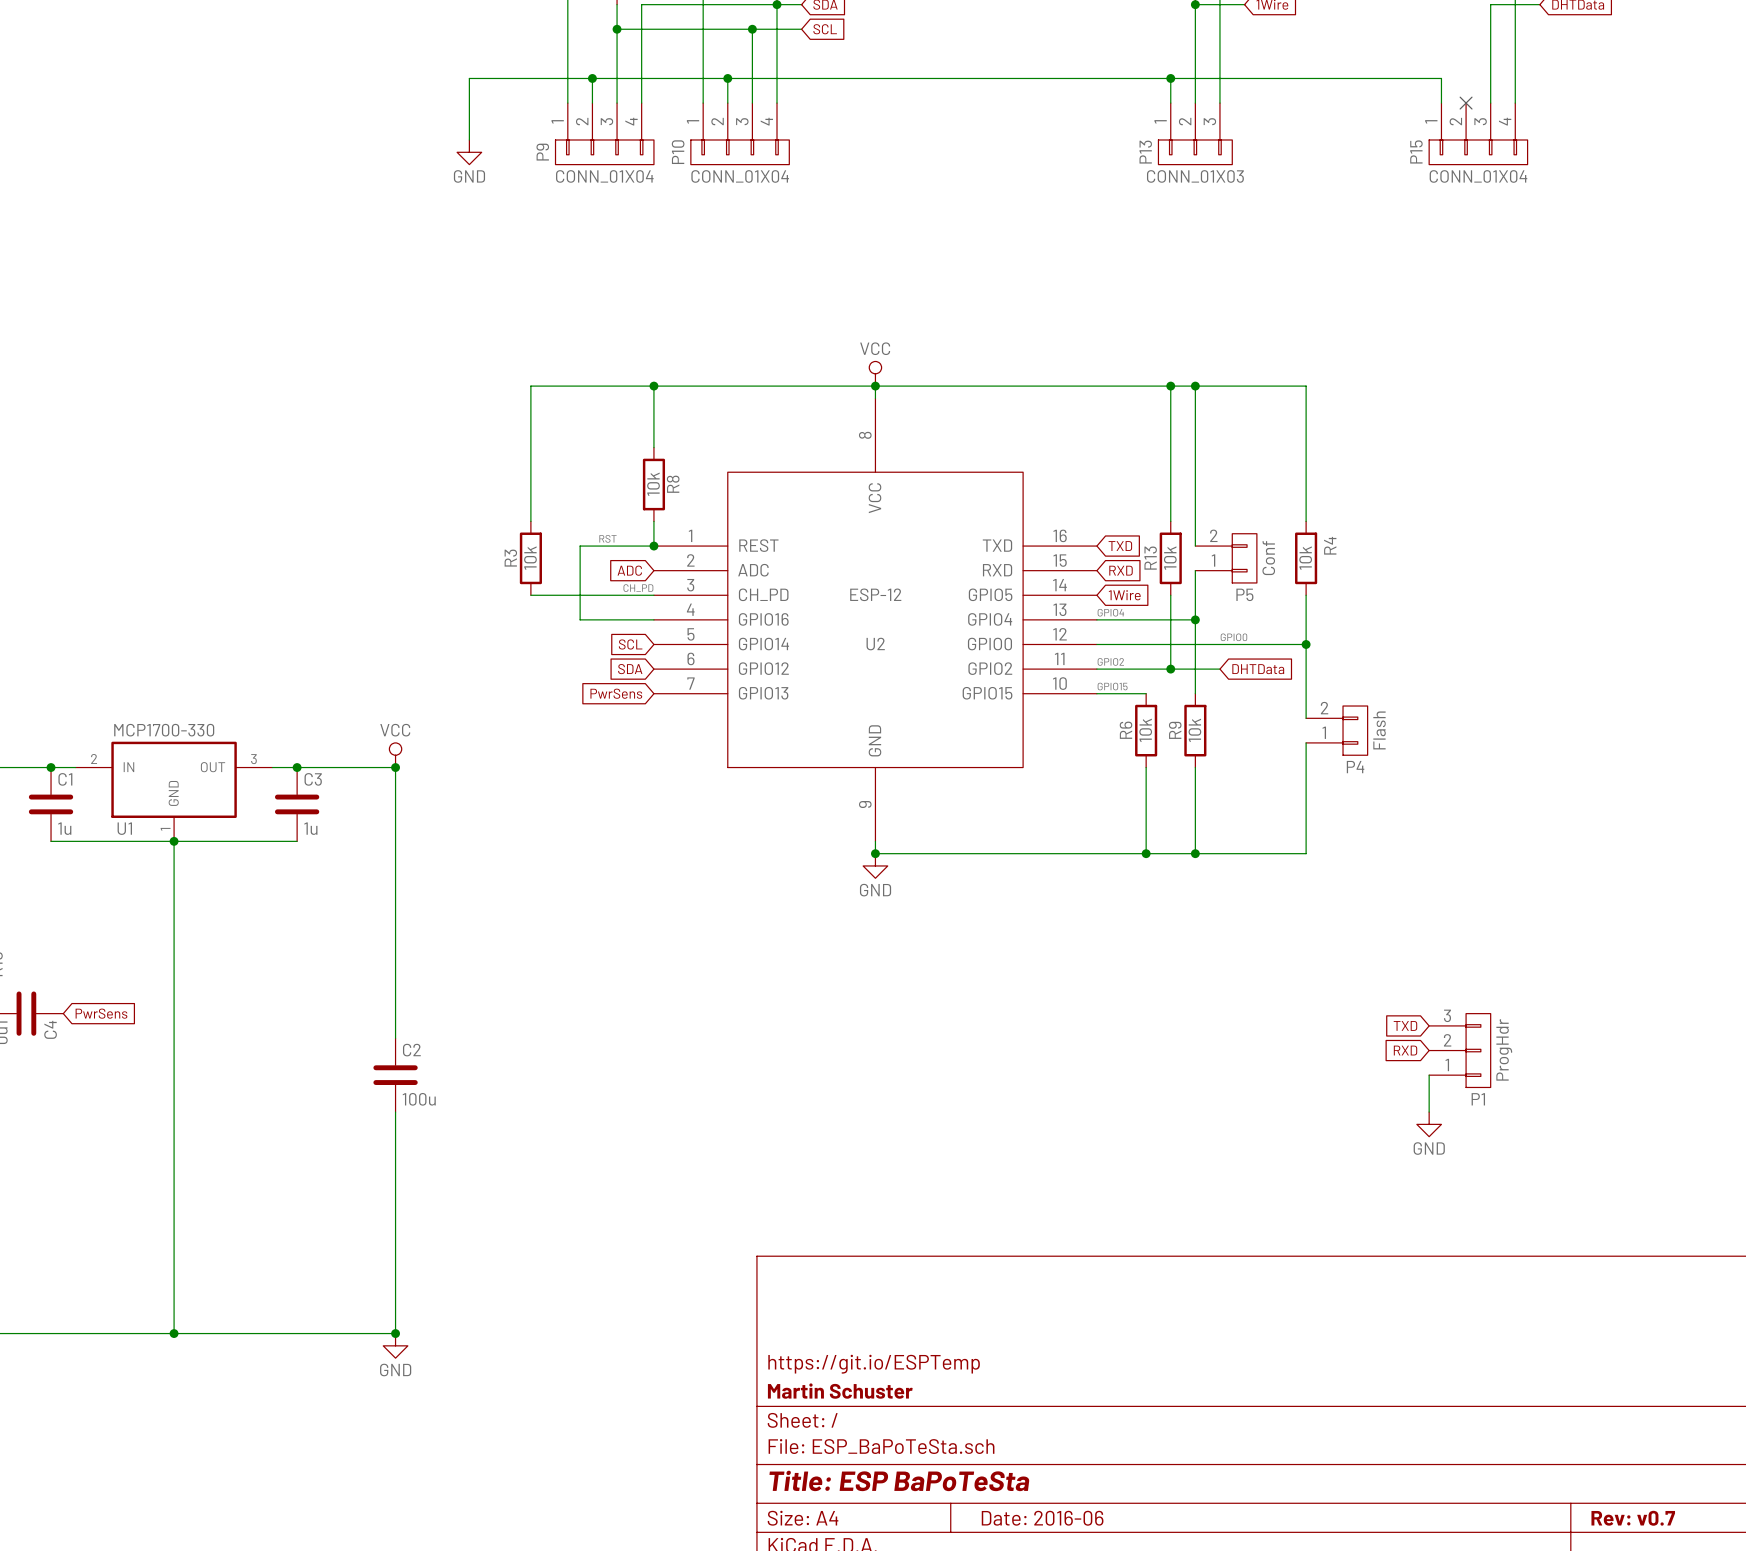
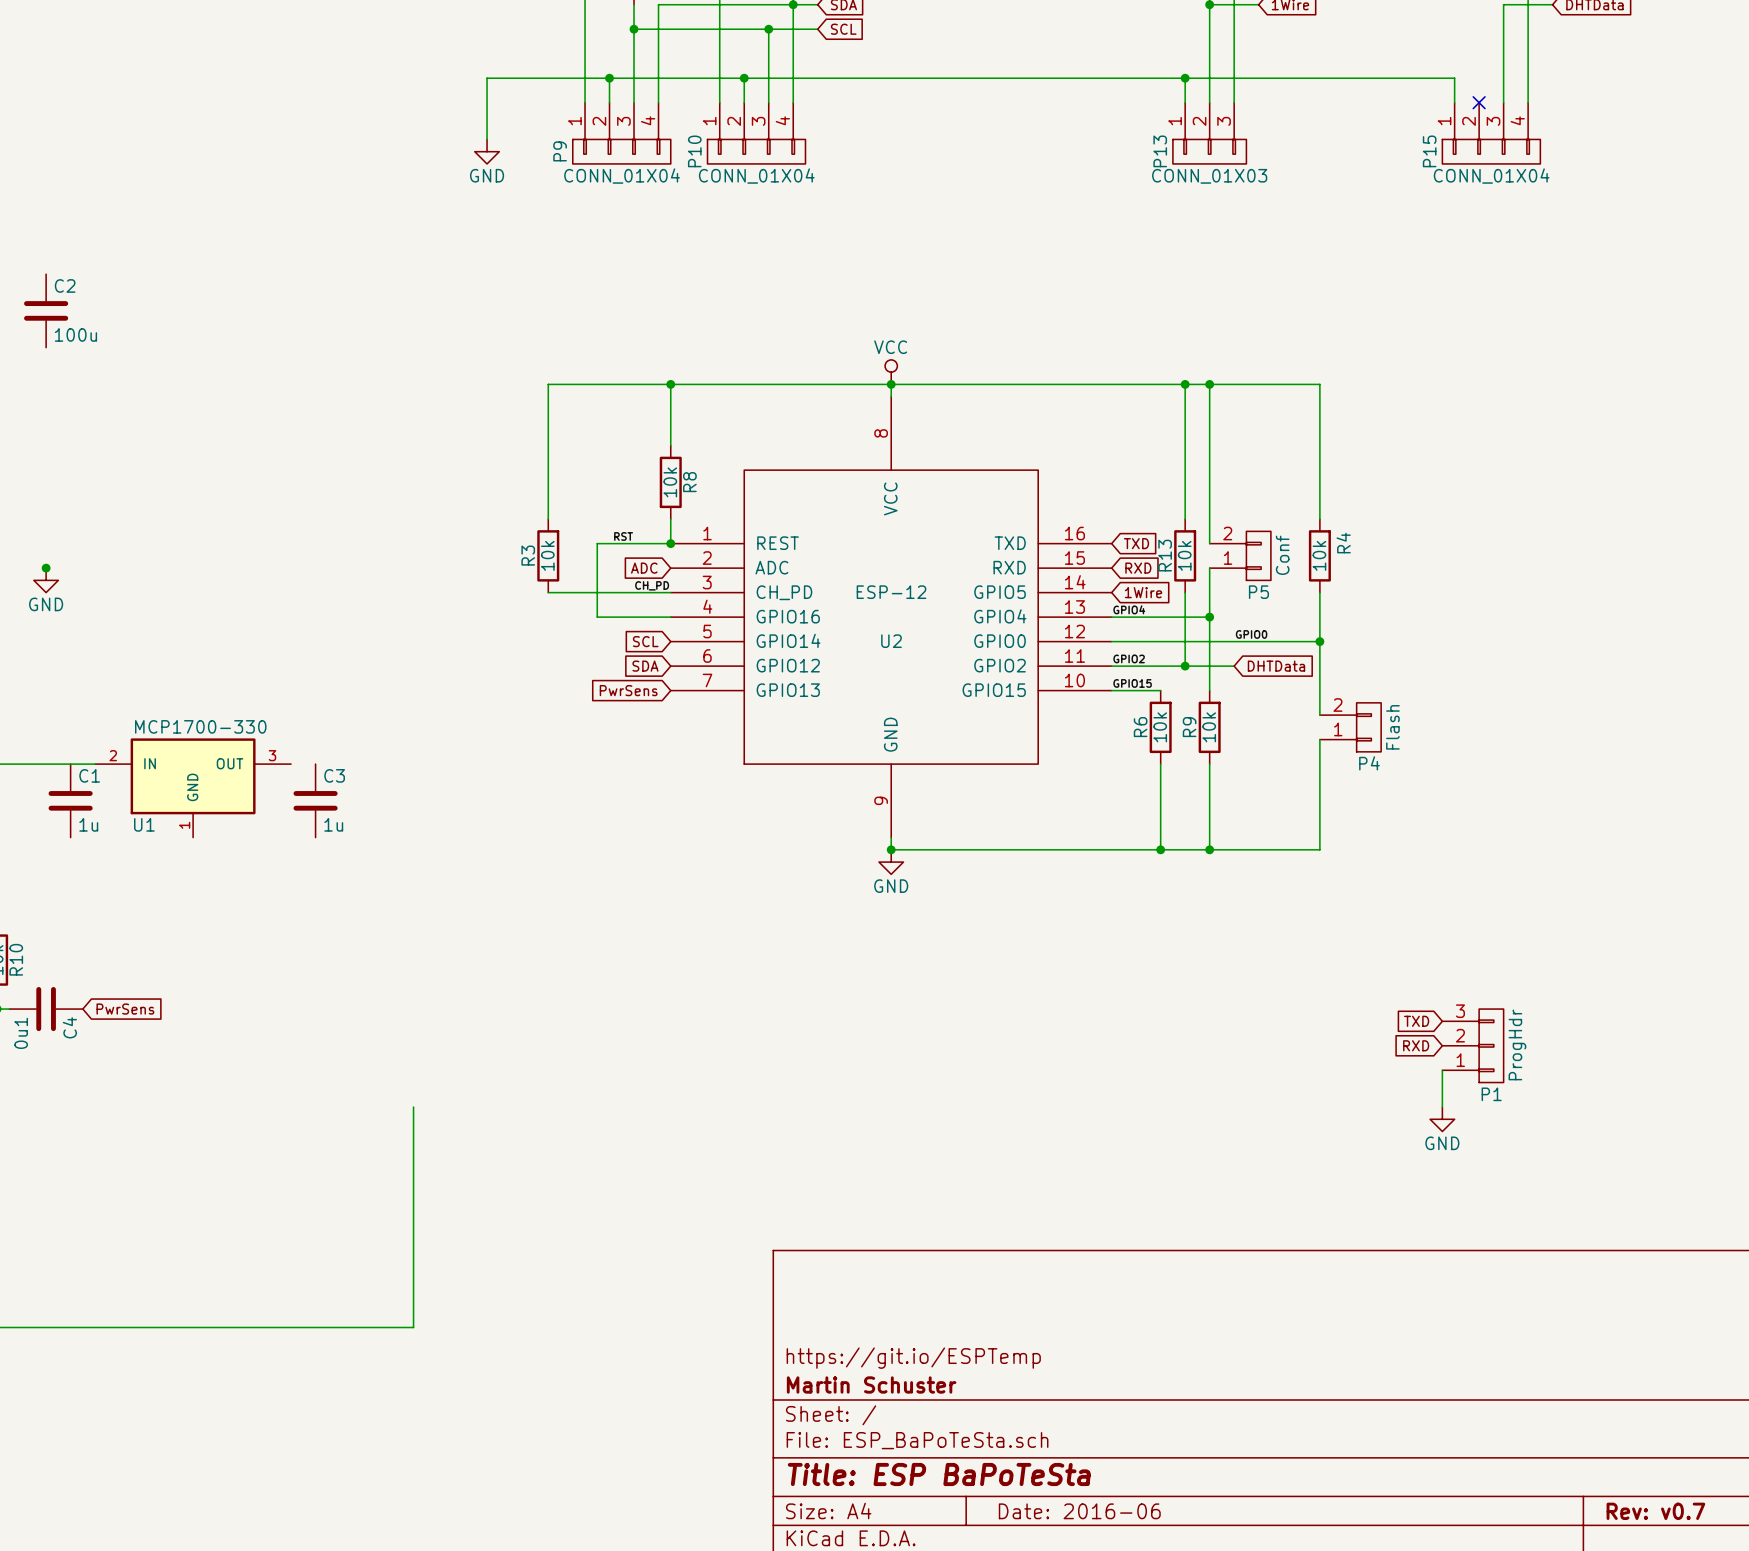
junction: none -> (46, 568)
power symbol: none -> GND (46, 580)
power symbol: VCC (395, 755) -> none
junction: (51, 767) -> none
wire: (272, 767) (395, 767) (395, 1038) -> none
junction: (297, 767) -> none
junction: (395, 767) -> none
wire: (51, 841) (297, 841) -> none
wire: (174, 841) (174, 1333) -> none
junction: (174, 841) -> none
C2 position: (395, 1075) -> (46, 310)
junction: (174, 1333) -> none
junction: (395, 1333) -> none
power symbol: GND (395, 1345) -> none

